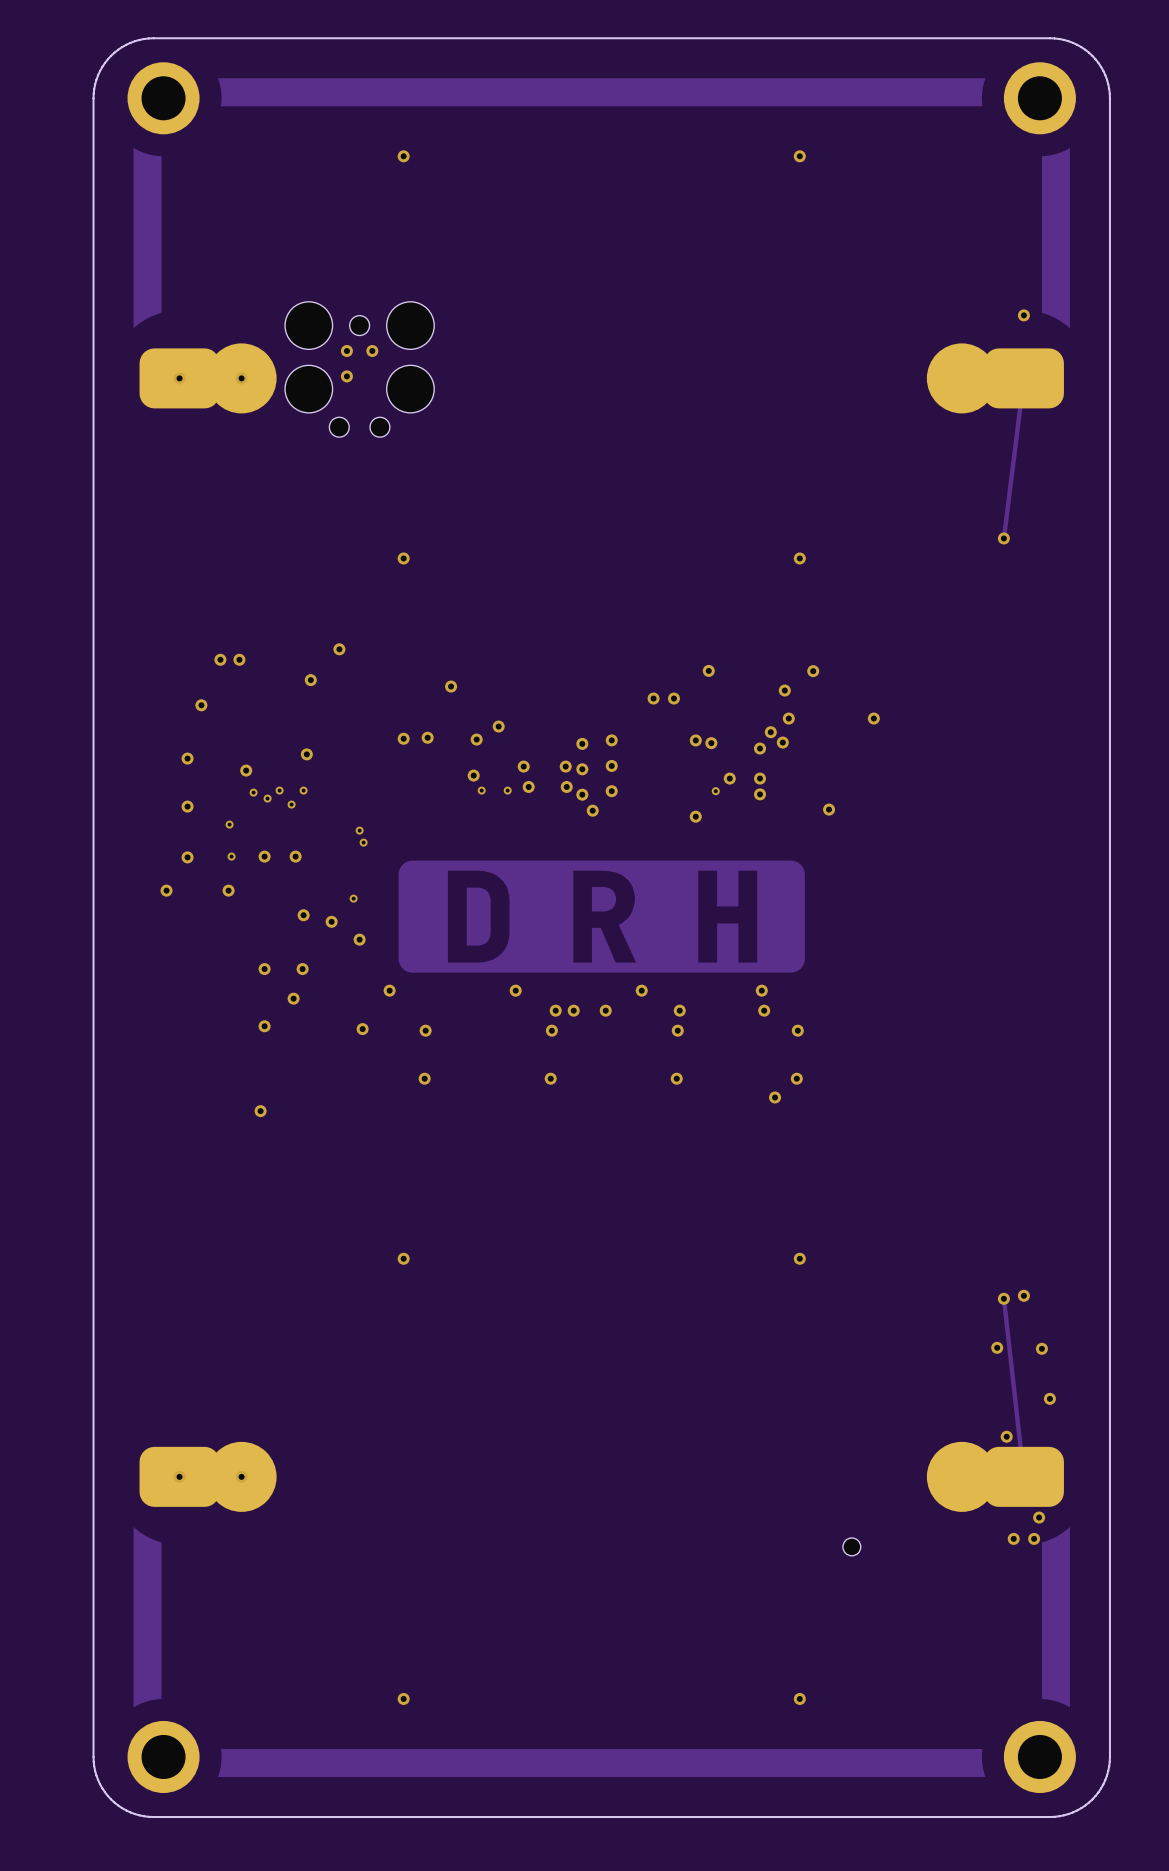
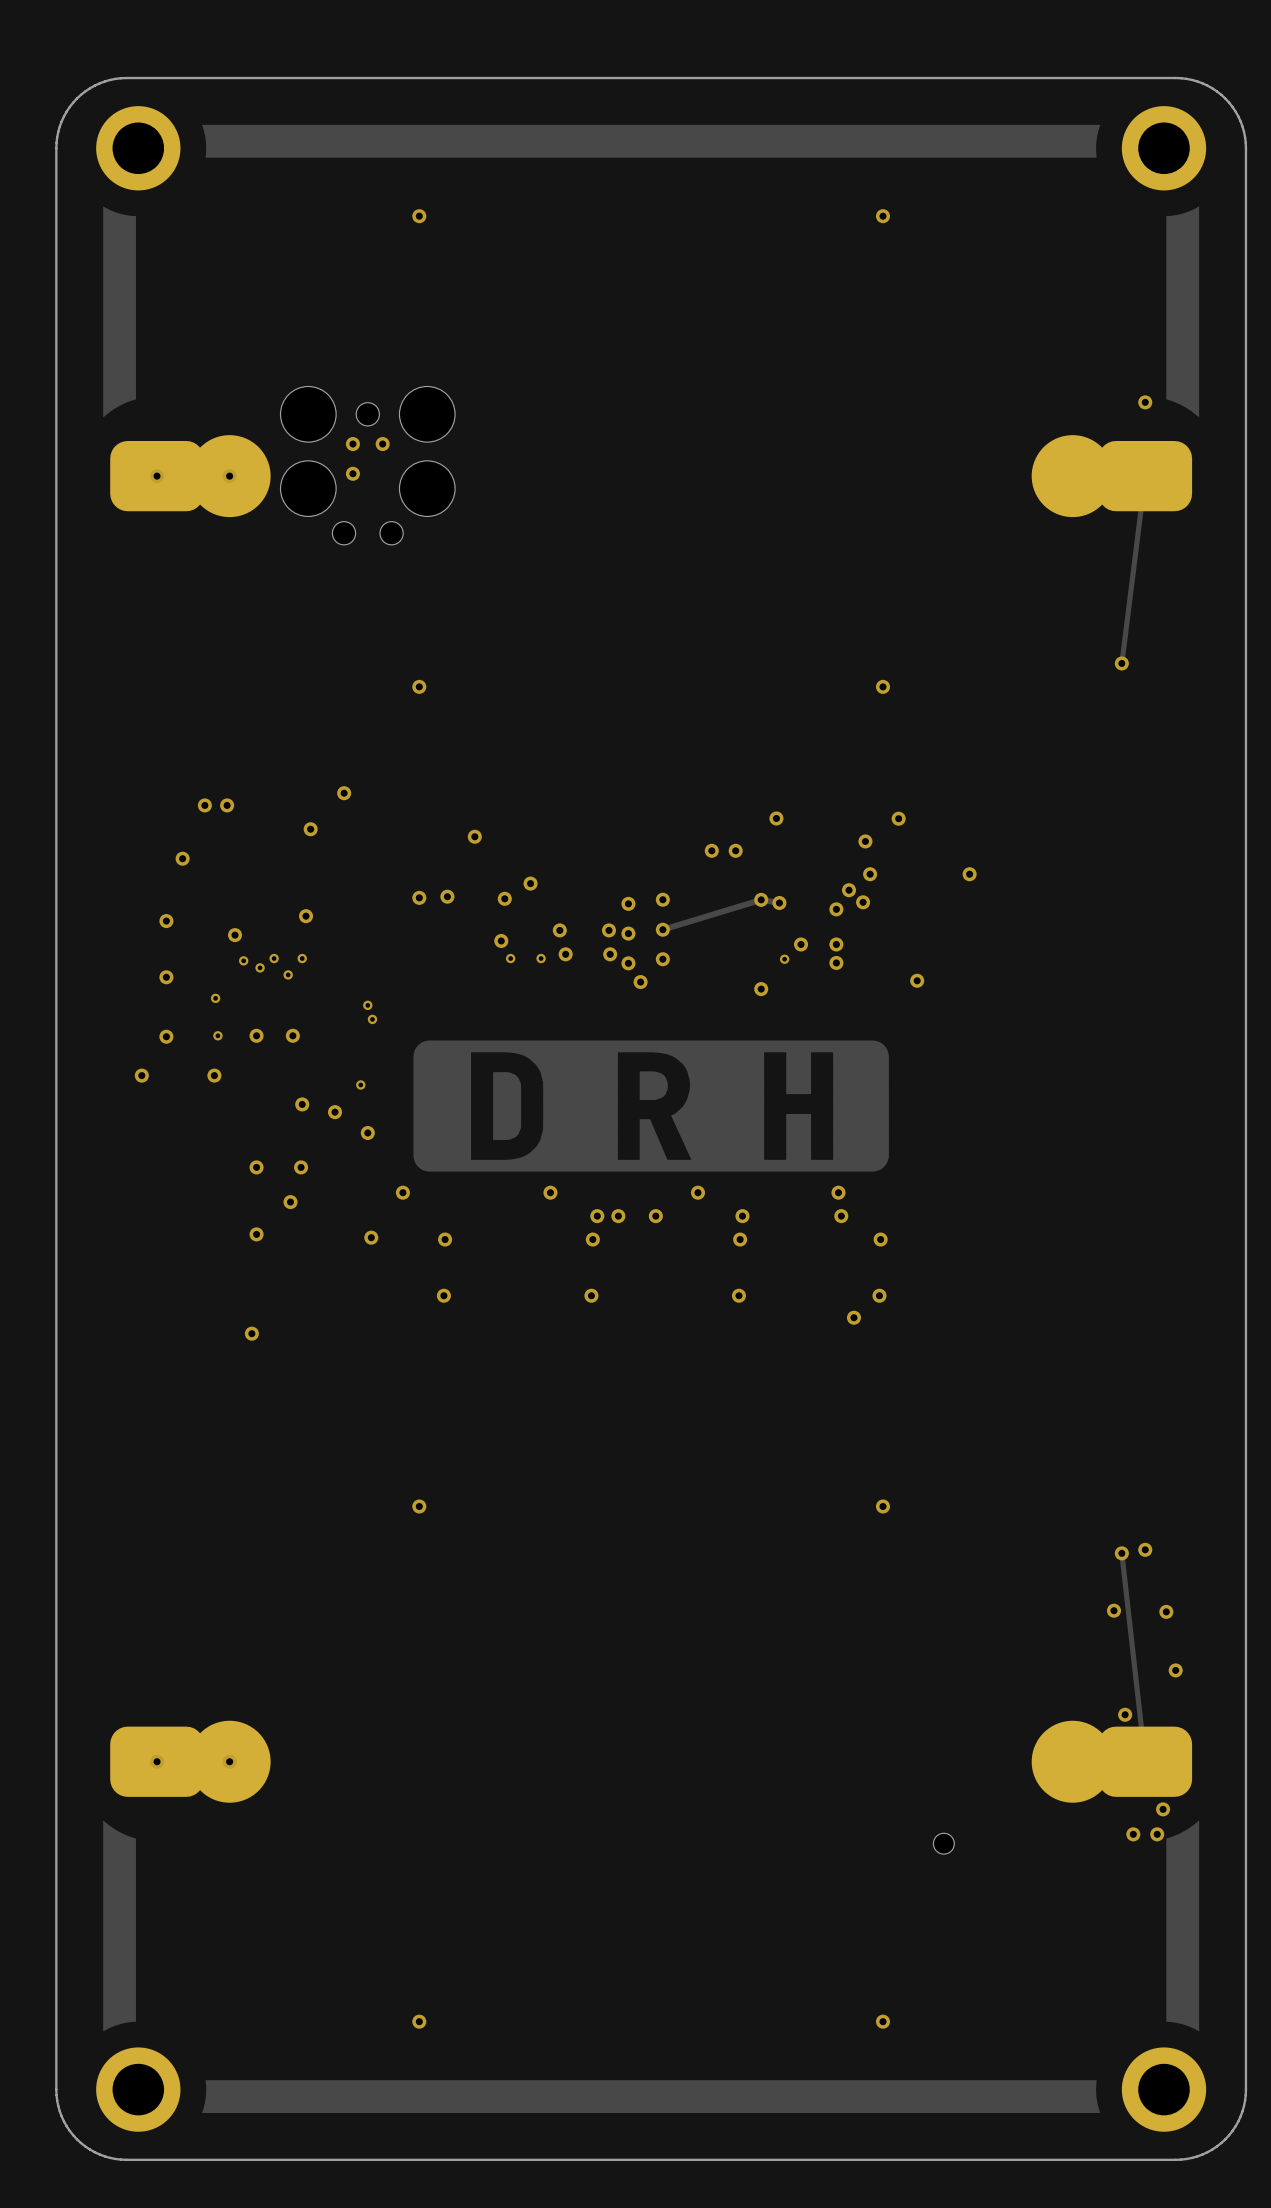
track: none -> (779, 903) (761, 899) (662, 929)

